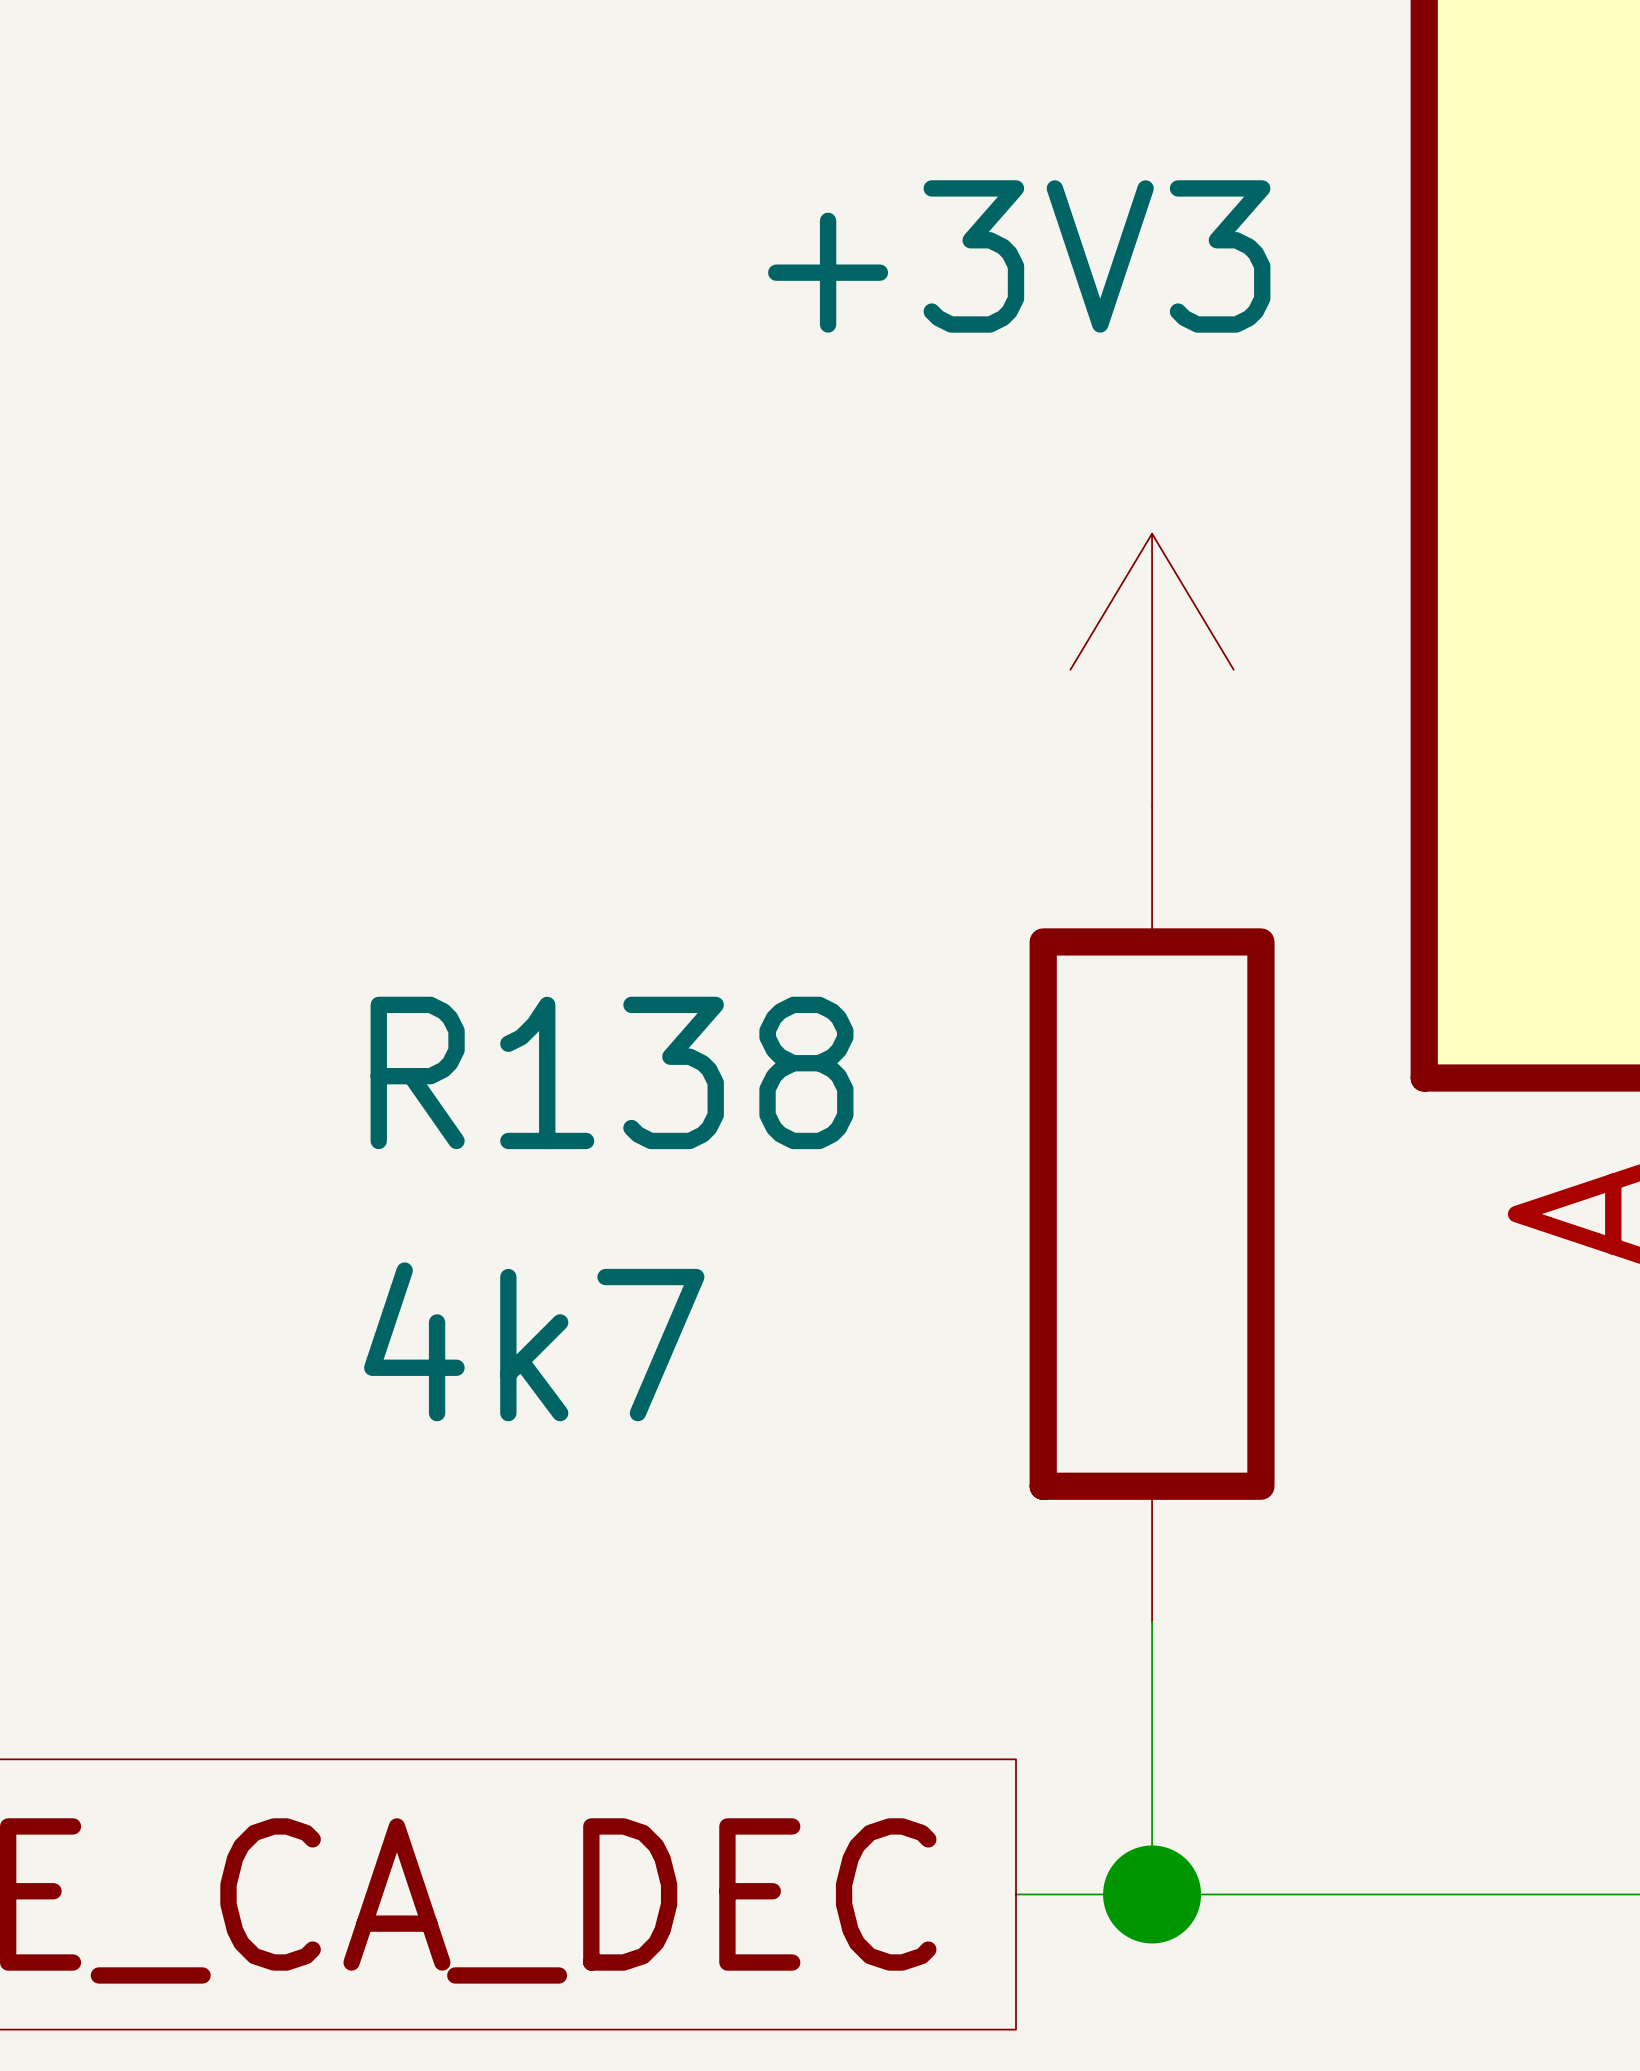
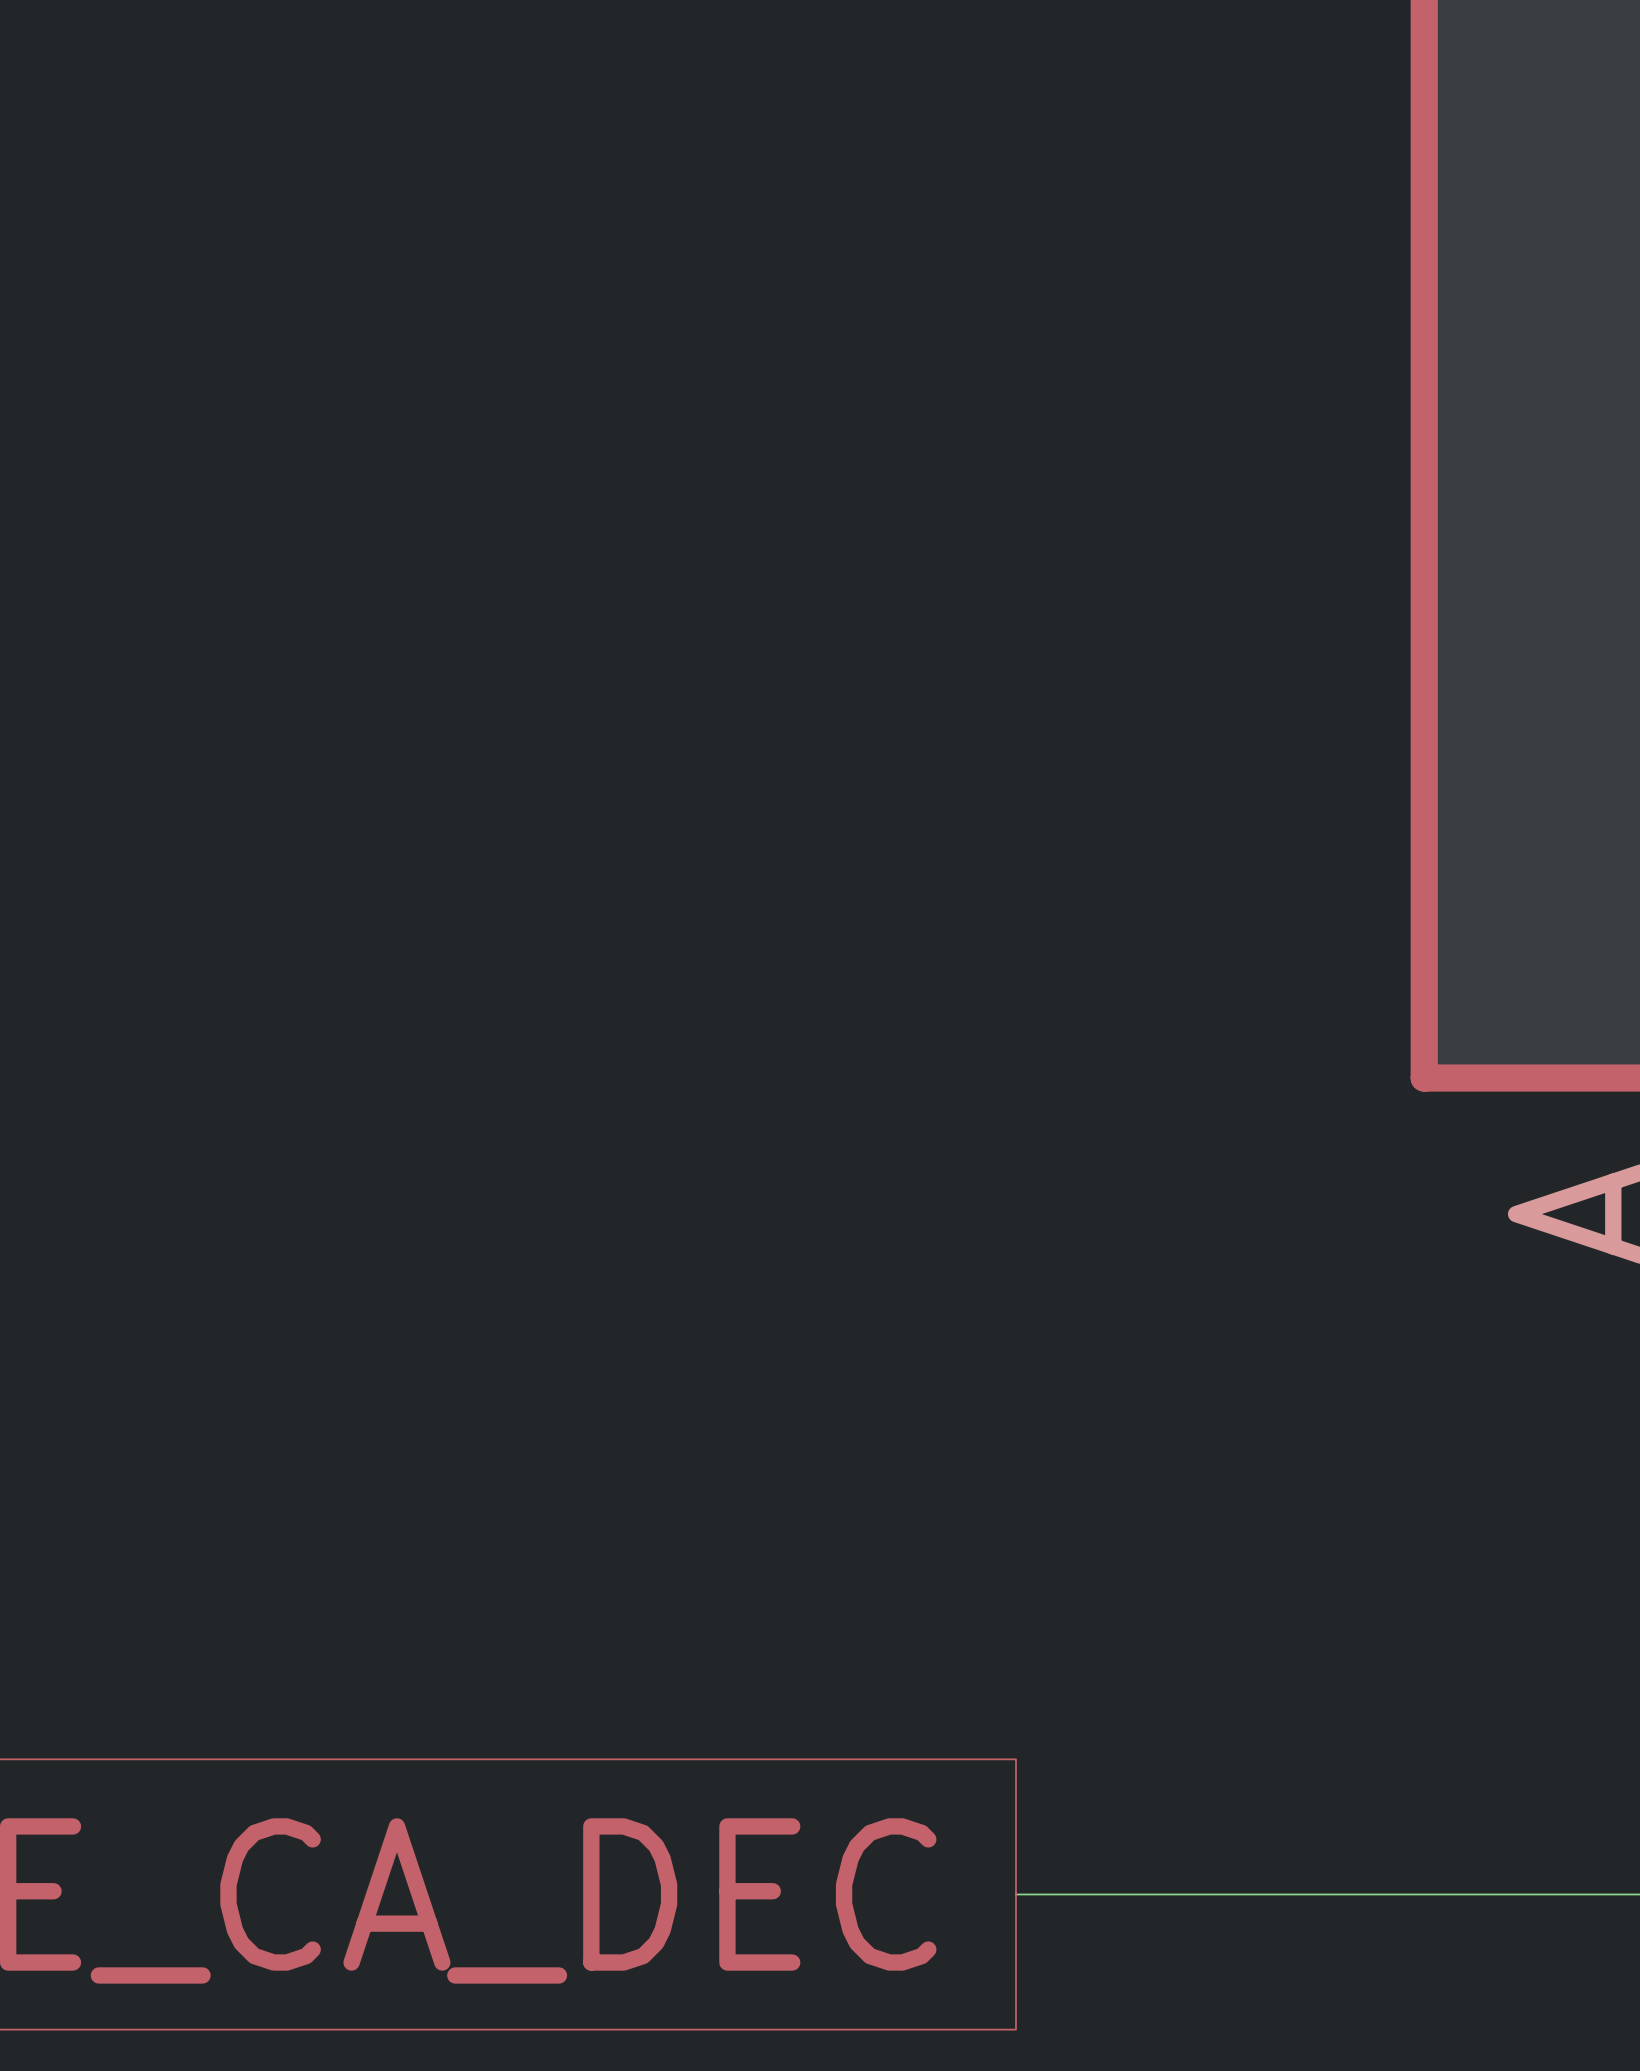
power symbol: +3V3 (1152, 669) -> none
R138: 4k7 (1152, 1214) -> none
wire: (1152, 1622) (1152, 1894) -> none
junction: (1152, 1894) -> none

